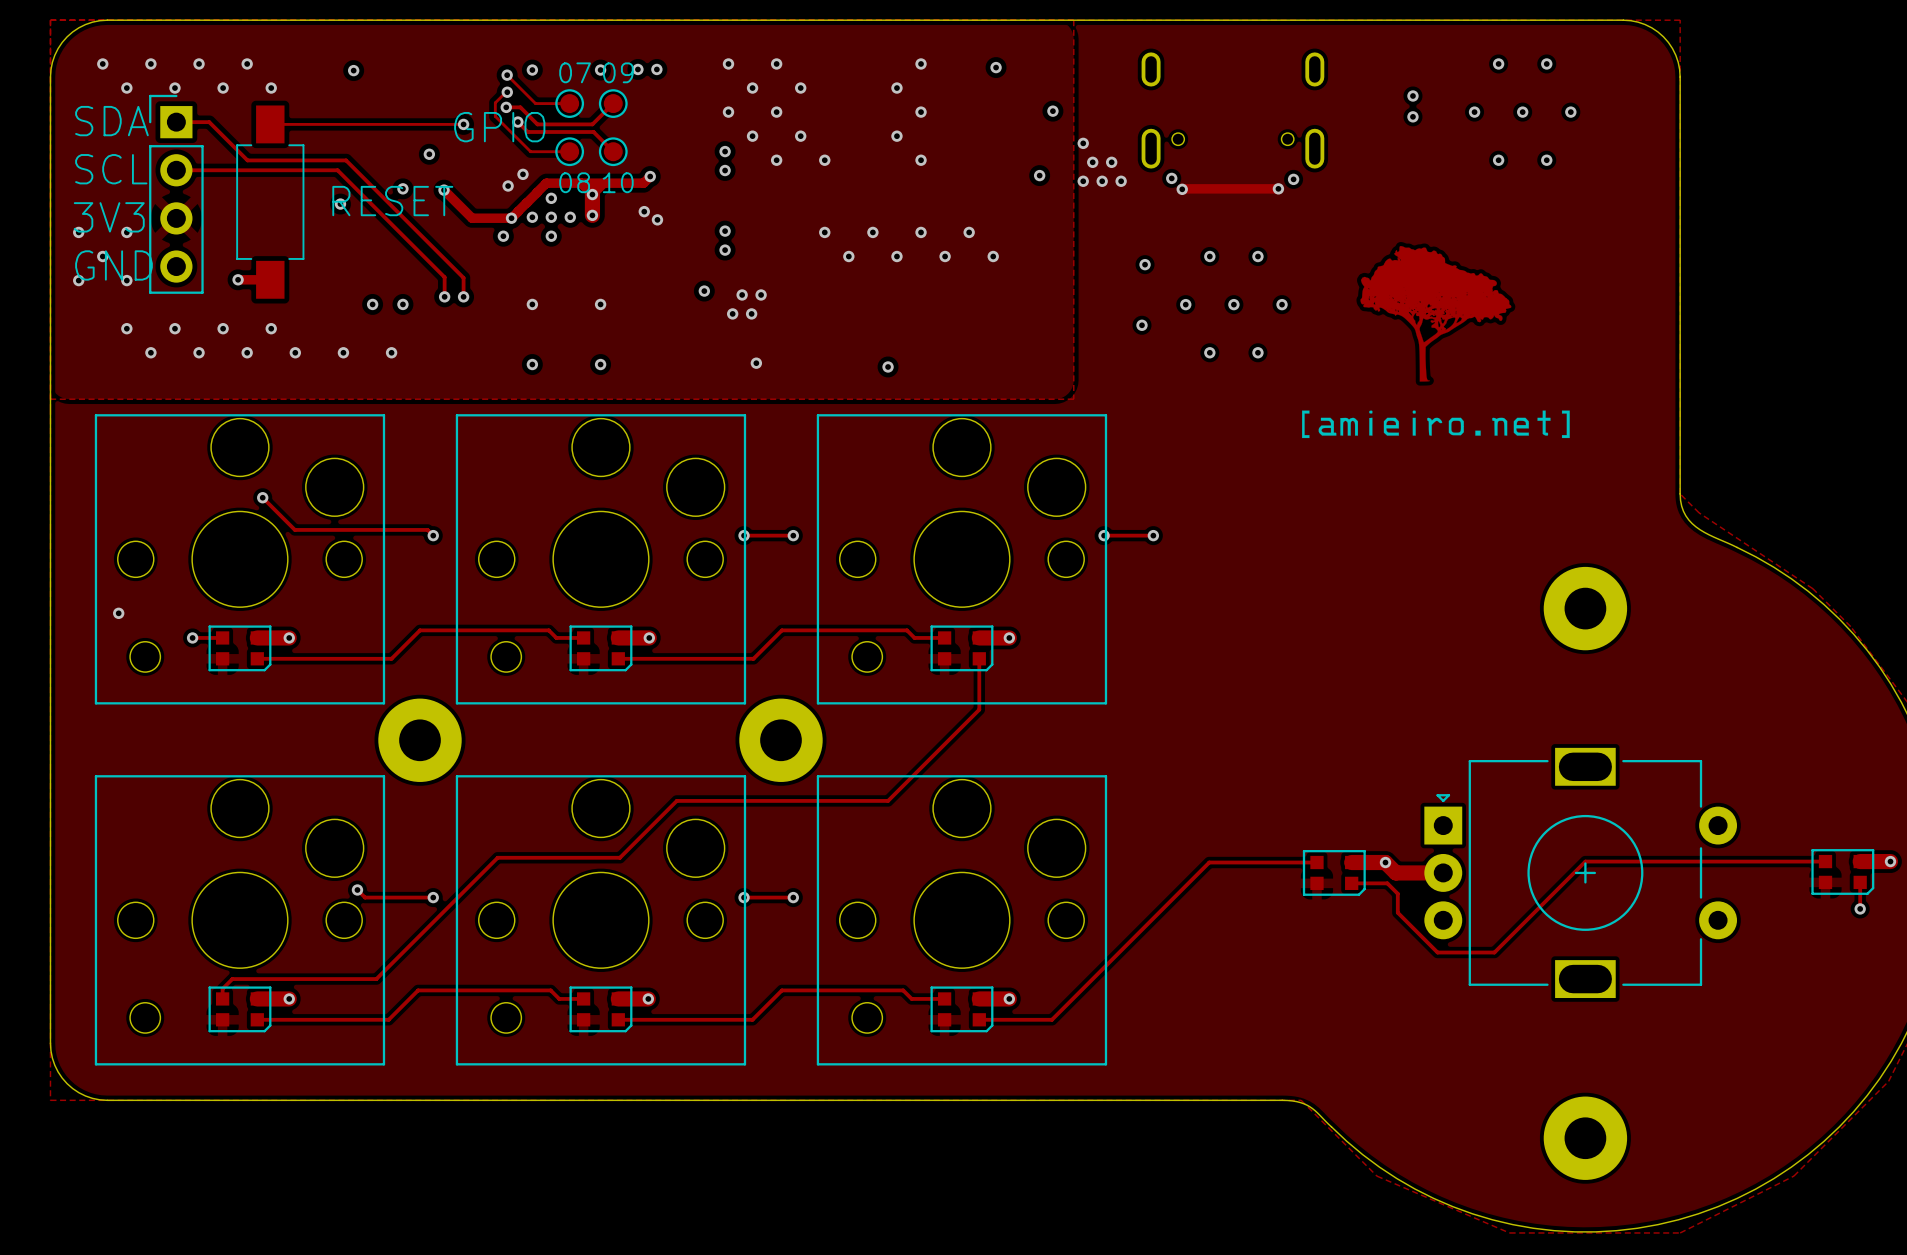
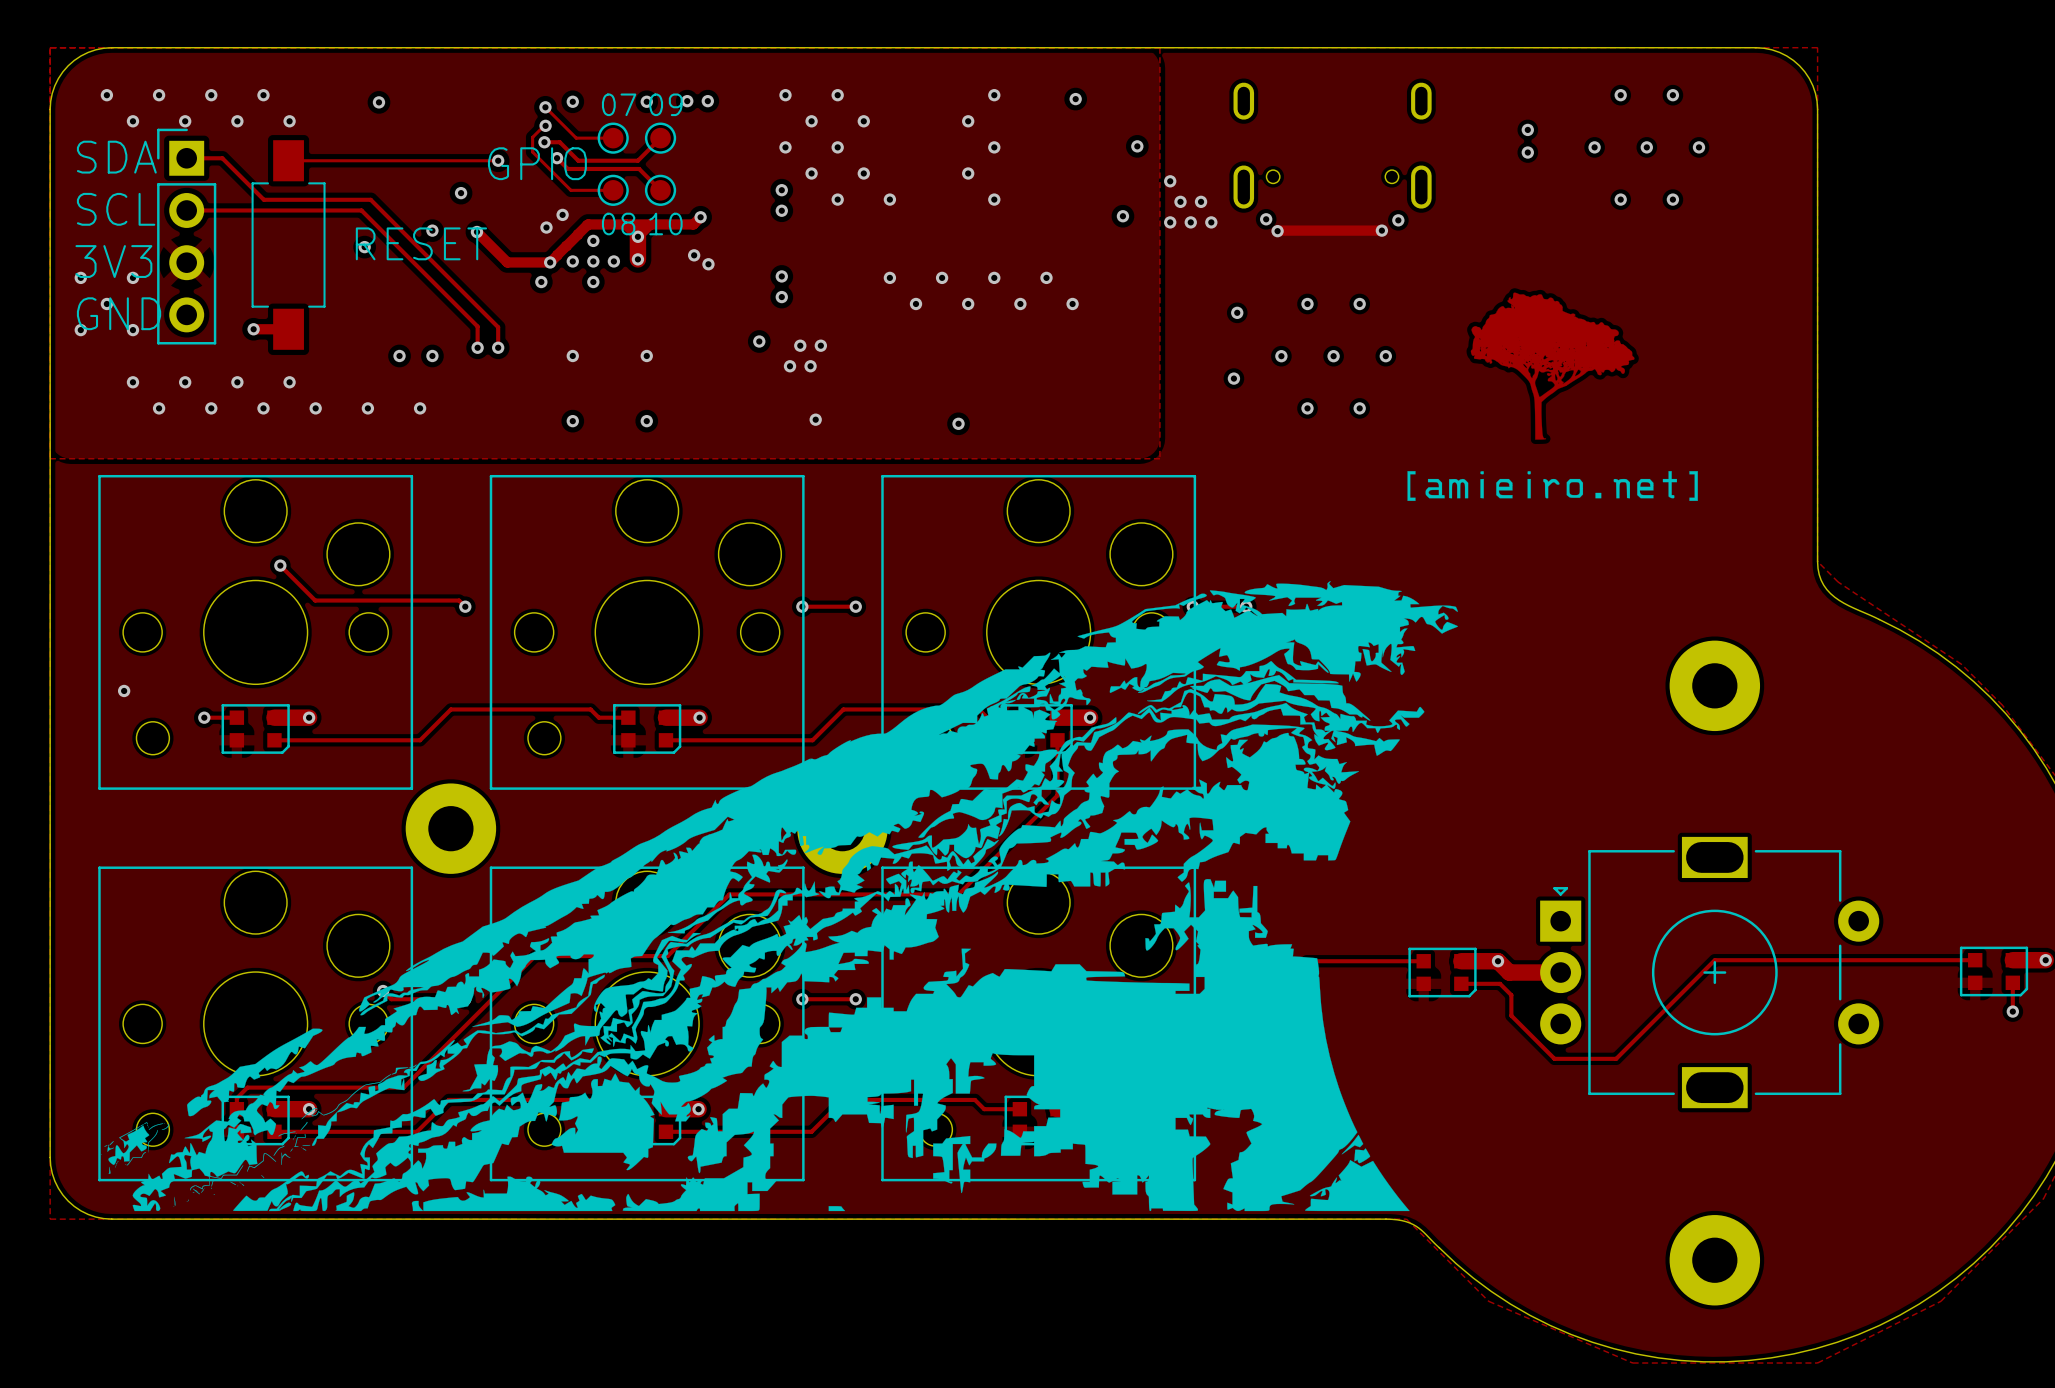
drawing: none -> [101, 581, 1458, 1212]

